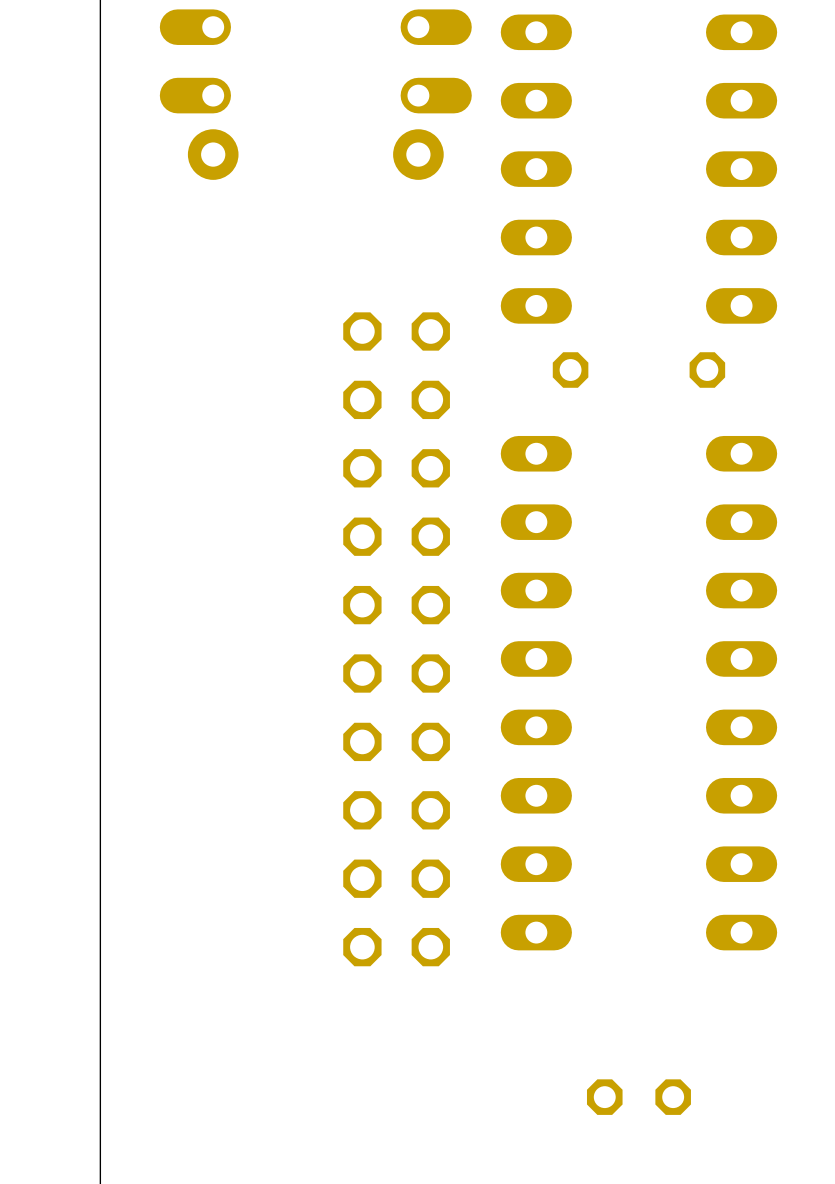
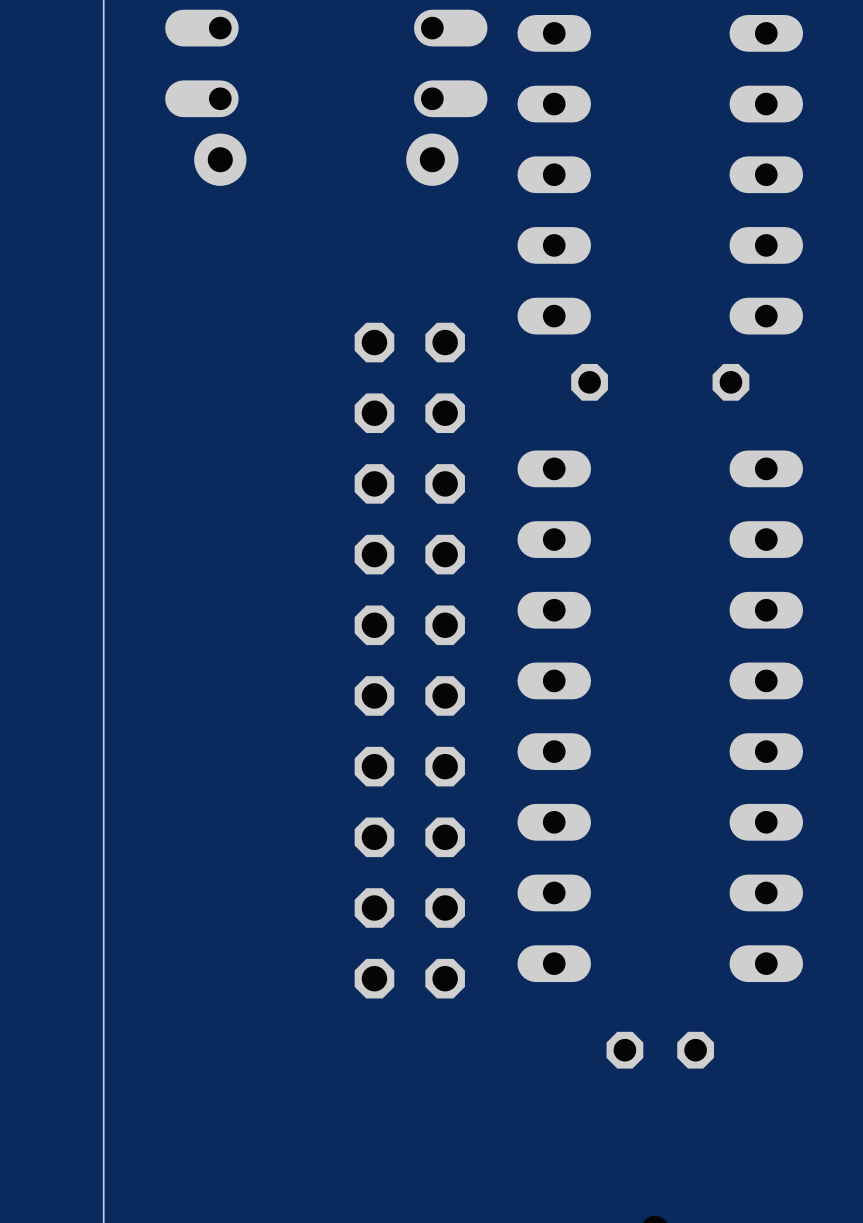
part position: (638, 1097) -> (660, 1050)

